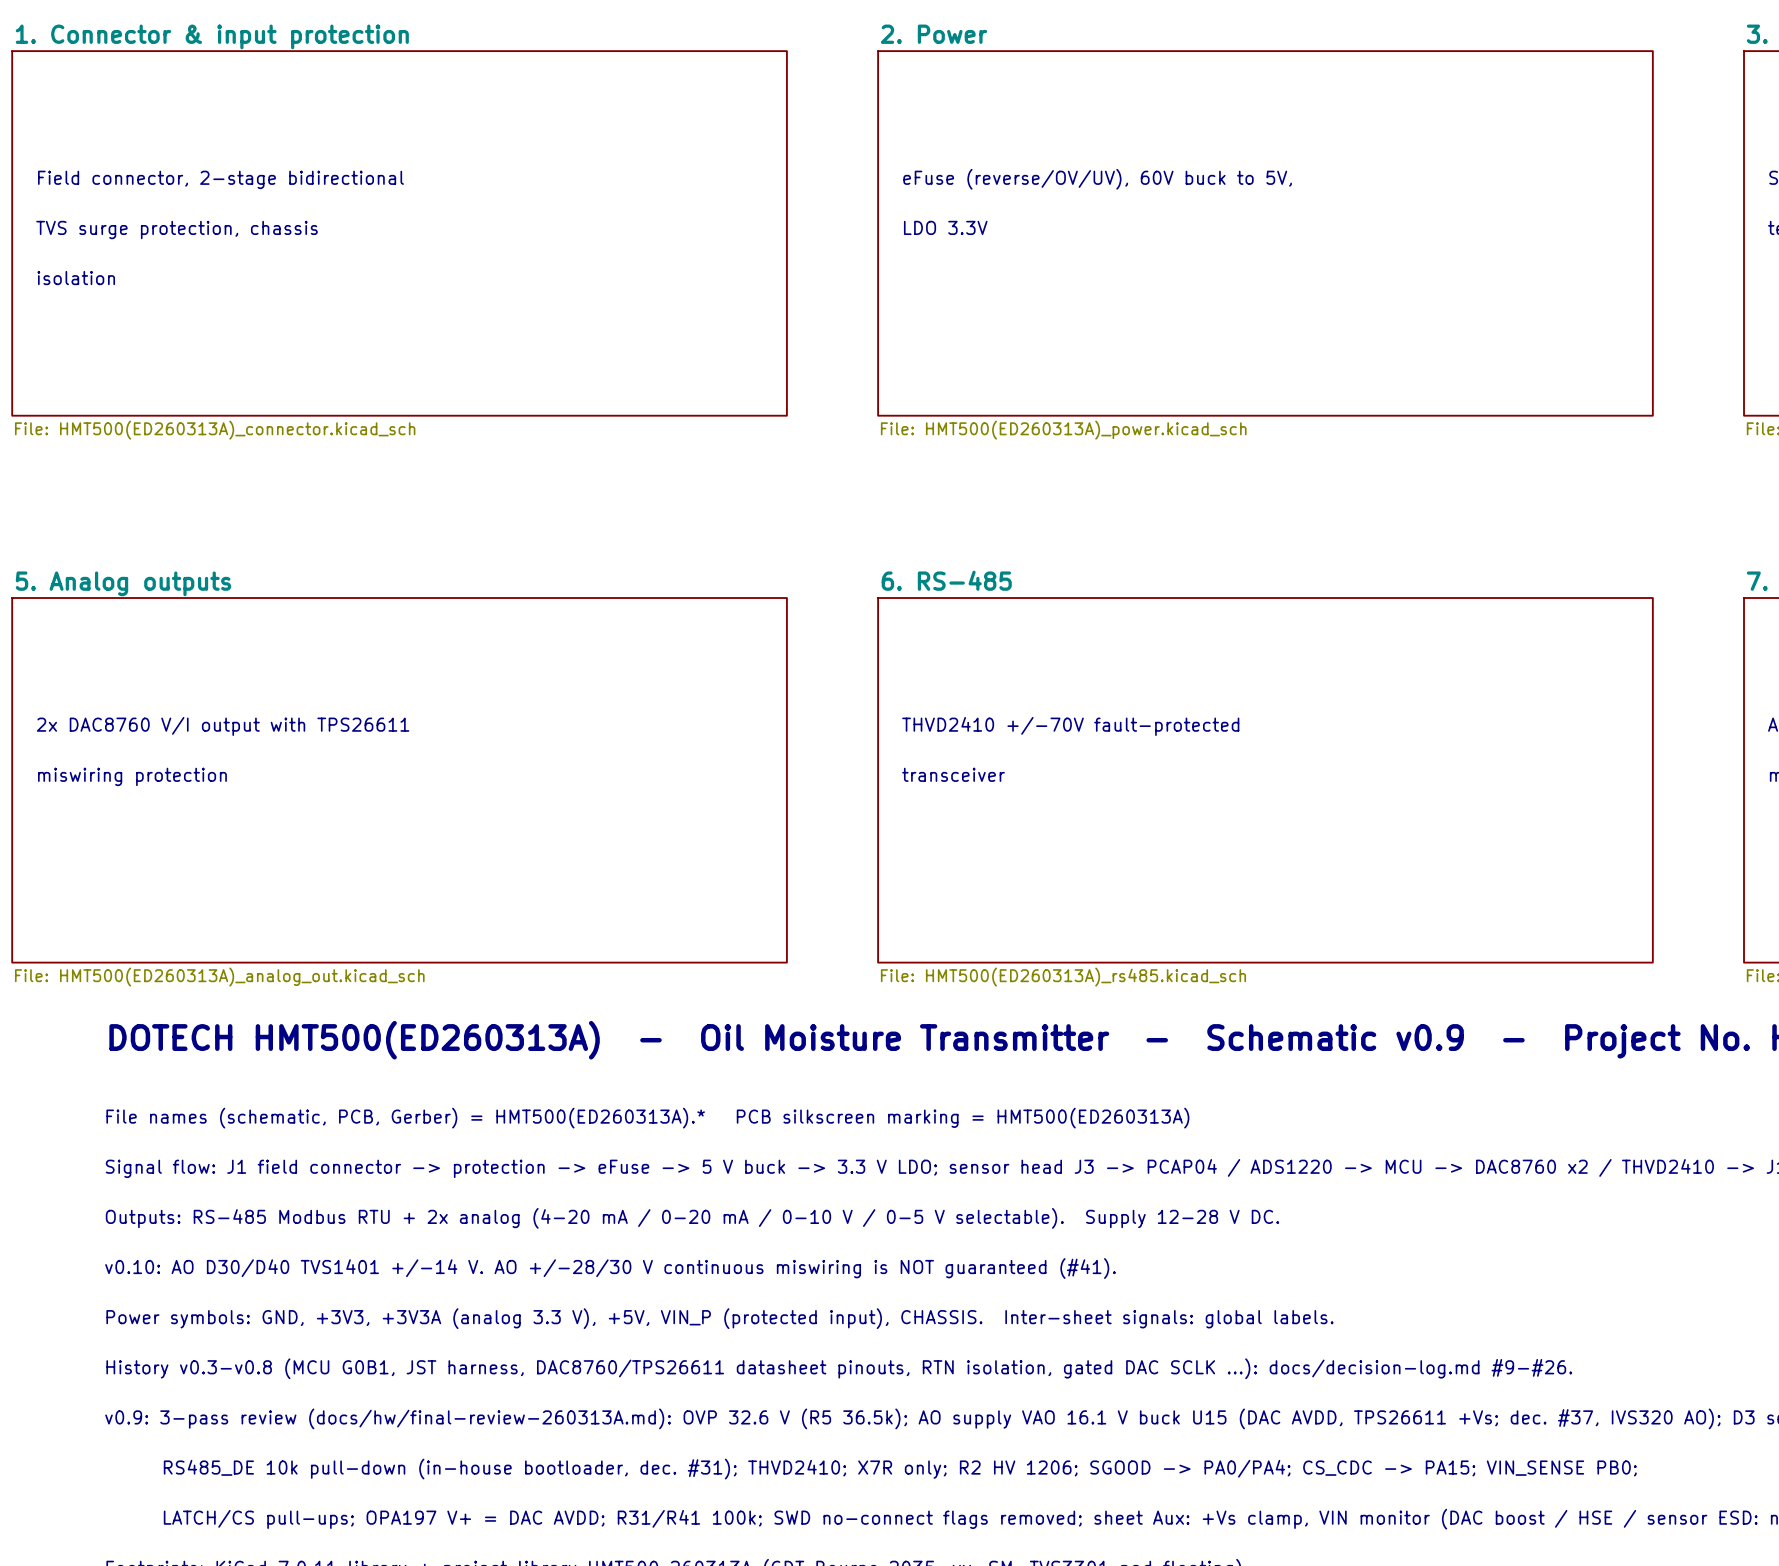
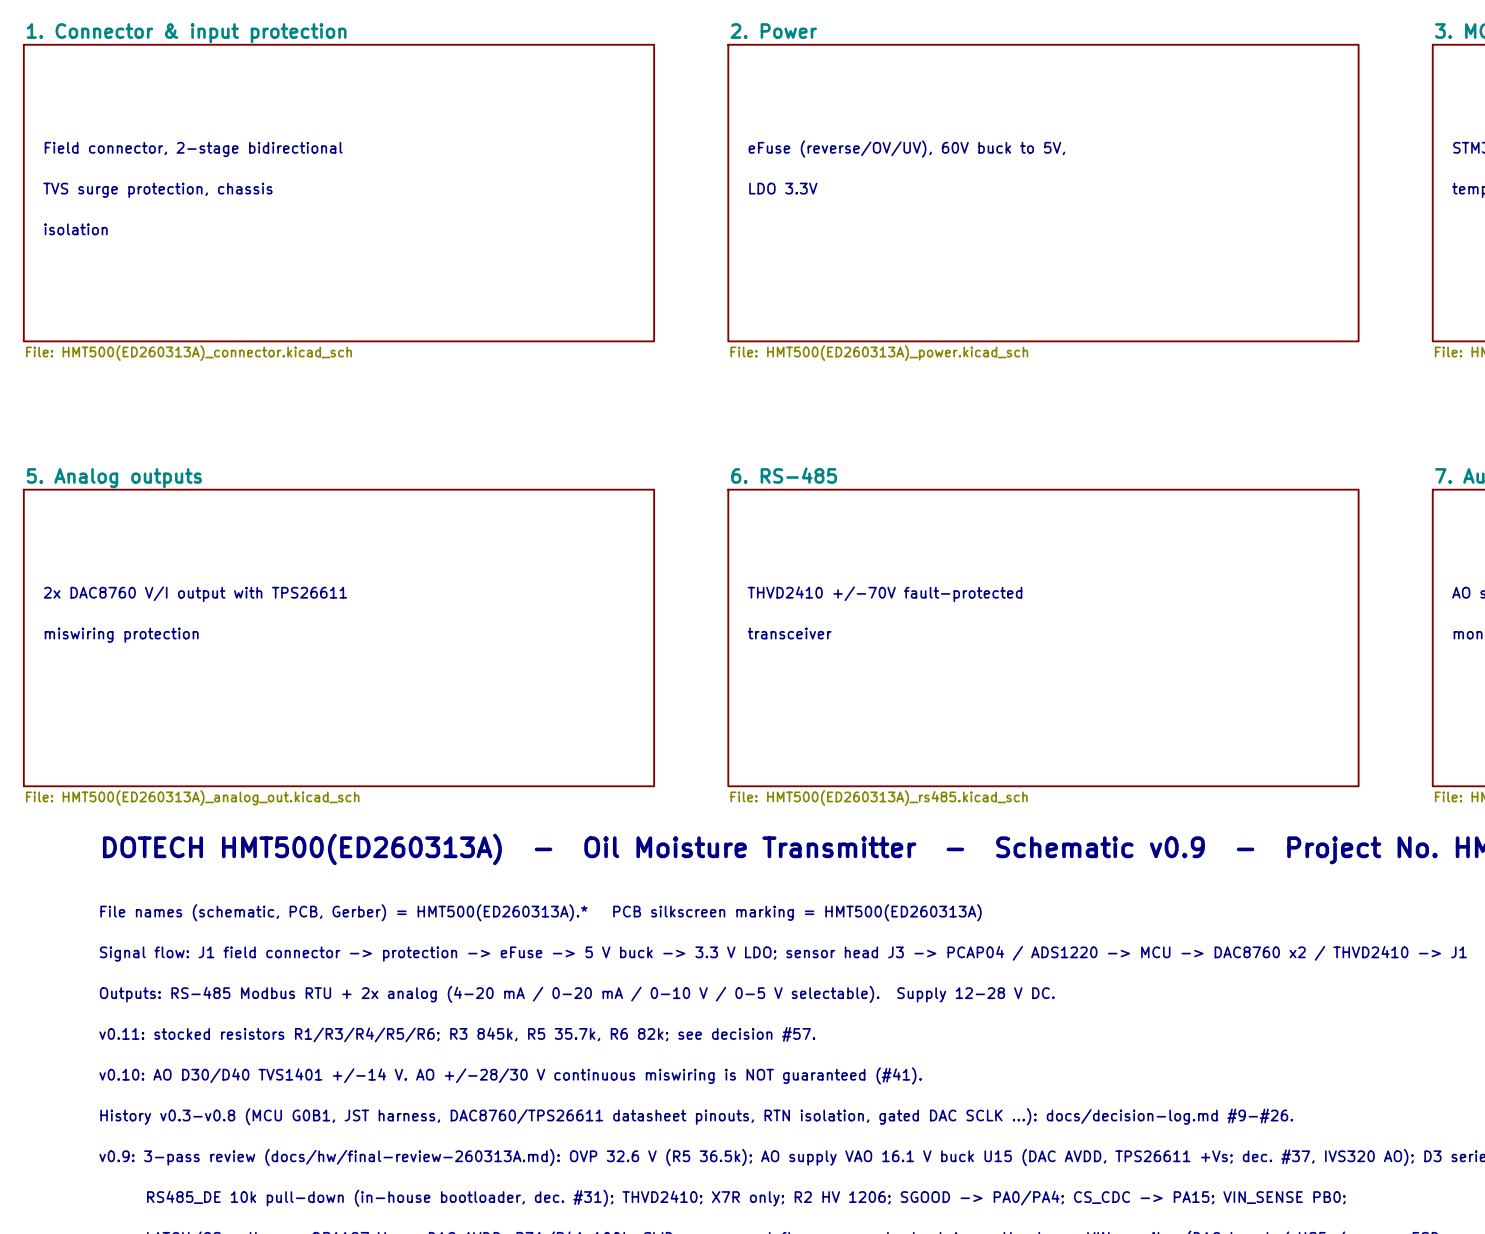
text: v0.10: AO D30/D40 TVS1401 +/-14 V. AO +/-28/30 V continuous miswiring is NOT guaranteed (#41). (610, 1268) -> v0.11: stocked resistors R1/R3/R4/R5/R6; R3 845k, R5 35.7k, R6 82k; see decision #57. (457, 1034)
text: Power symbols: GND, +3V3, +3V3A (analog 3.3 V), +5V, VIN_P (protected input), CHASSIS. Inter-sheet signals: global labels. (719, 1318) -> v0.10: AO D30/D40 TVS1401 +/-14 V. AO +/-28/30 V continuous miswiring is NOT guaranteed (#41). (510, 1075)

